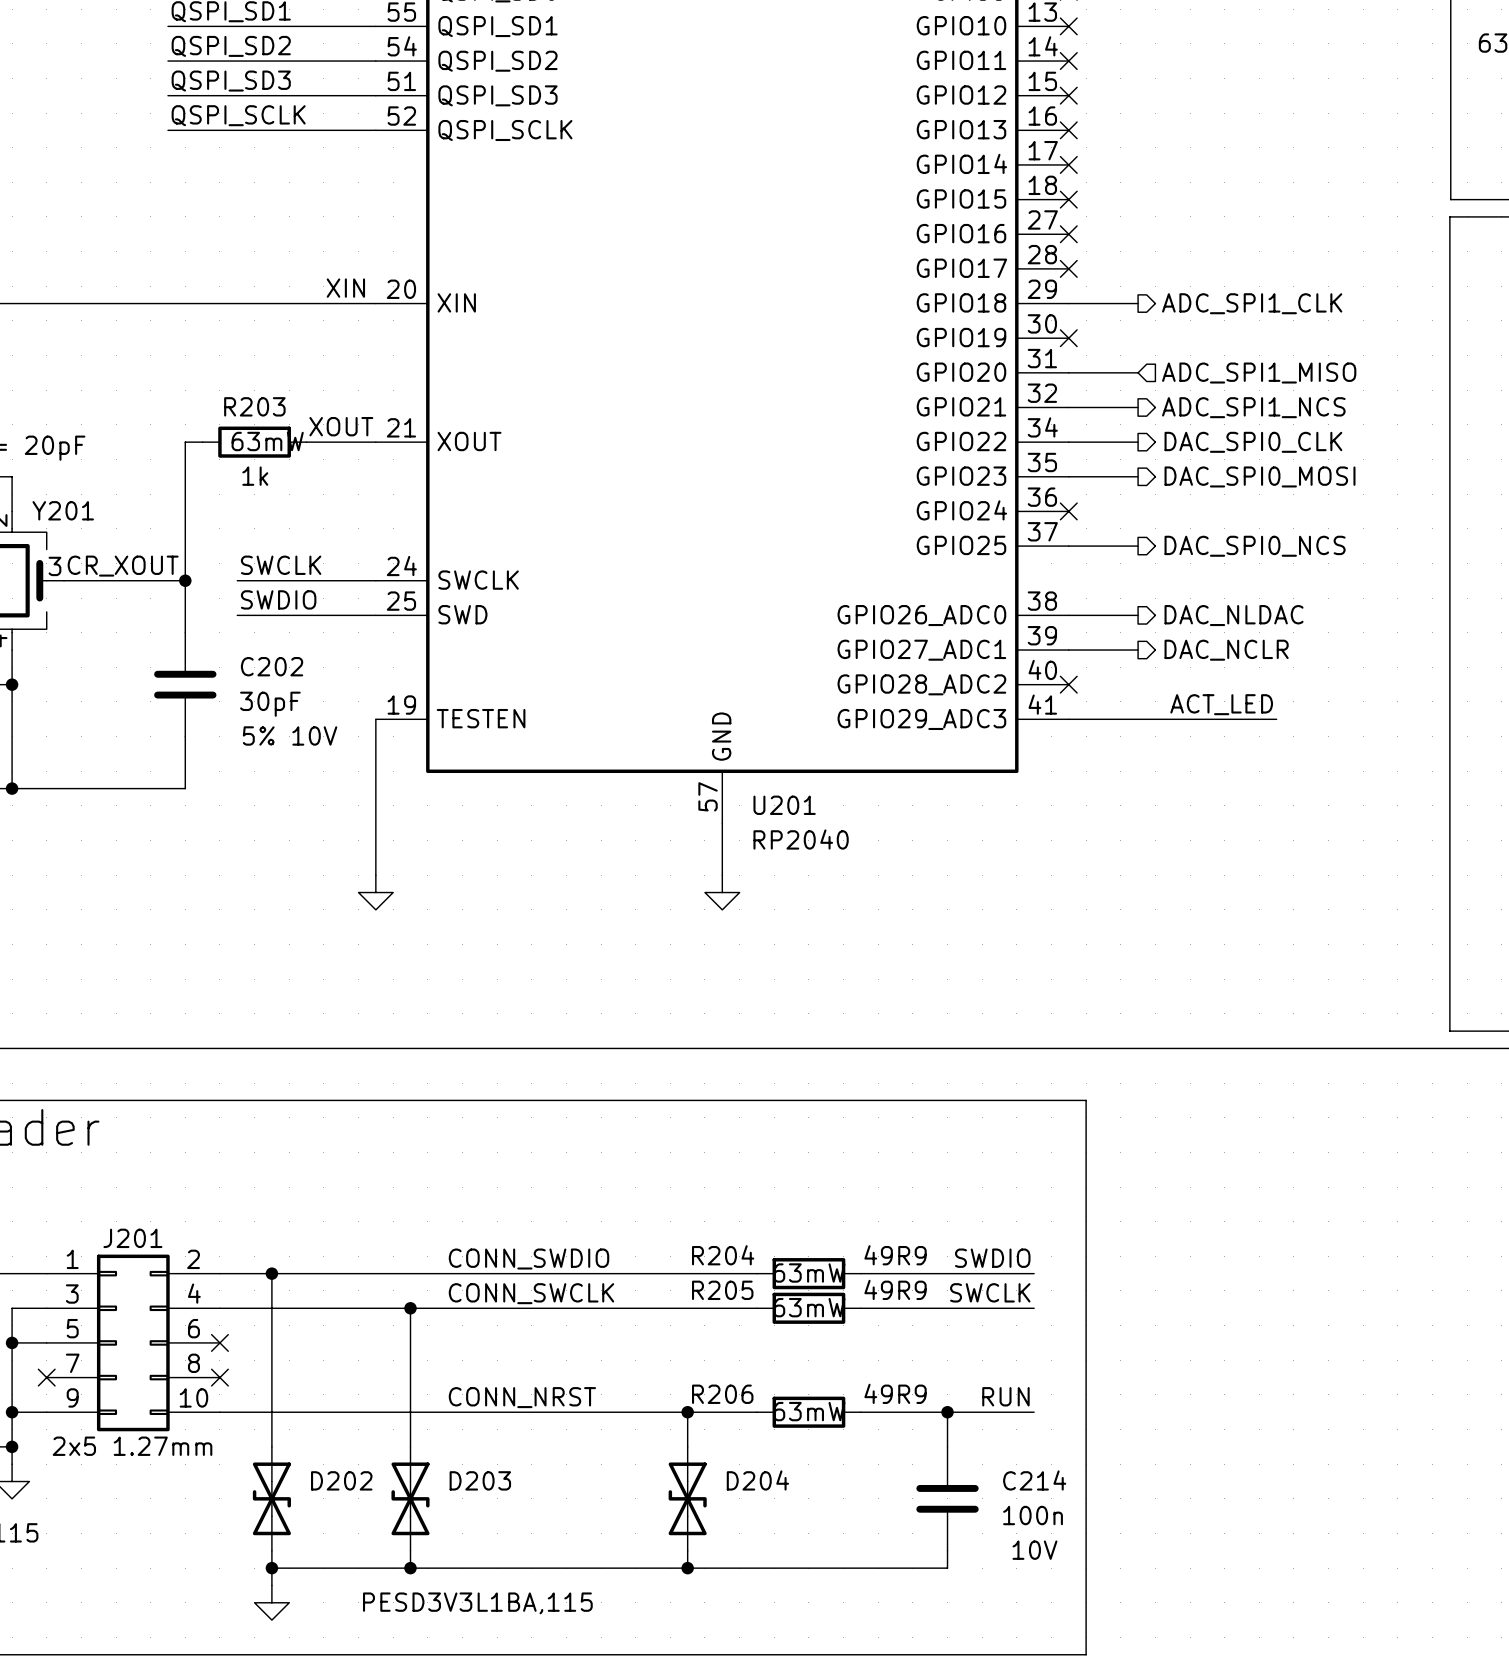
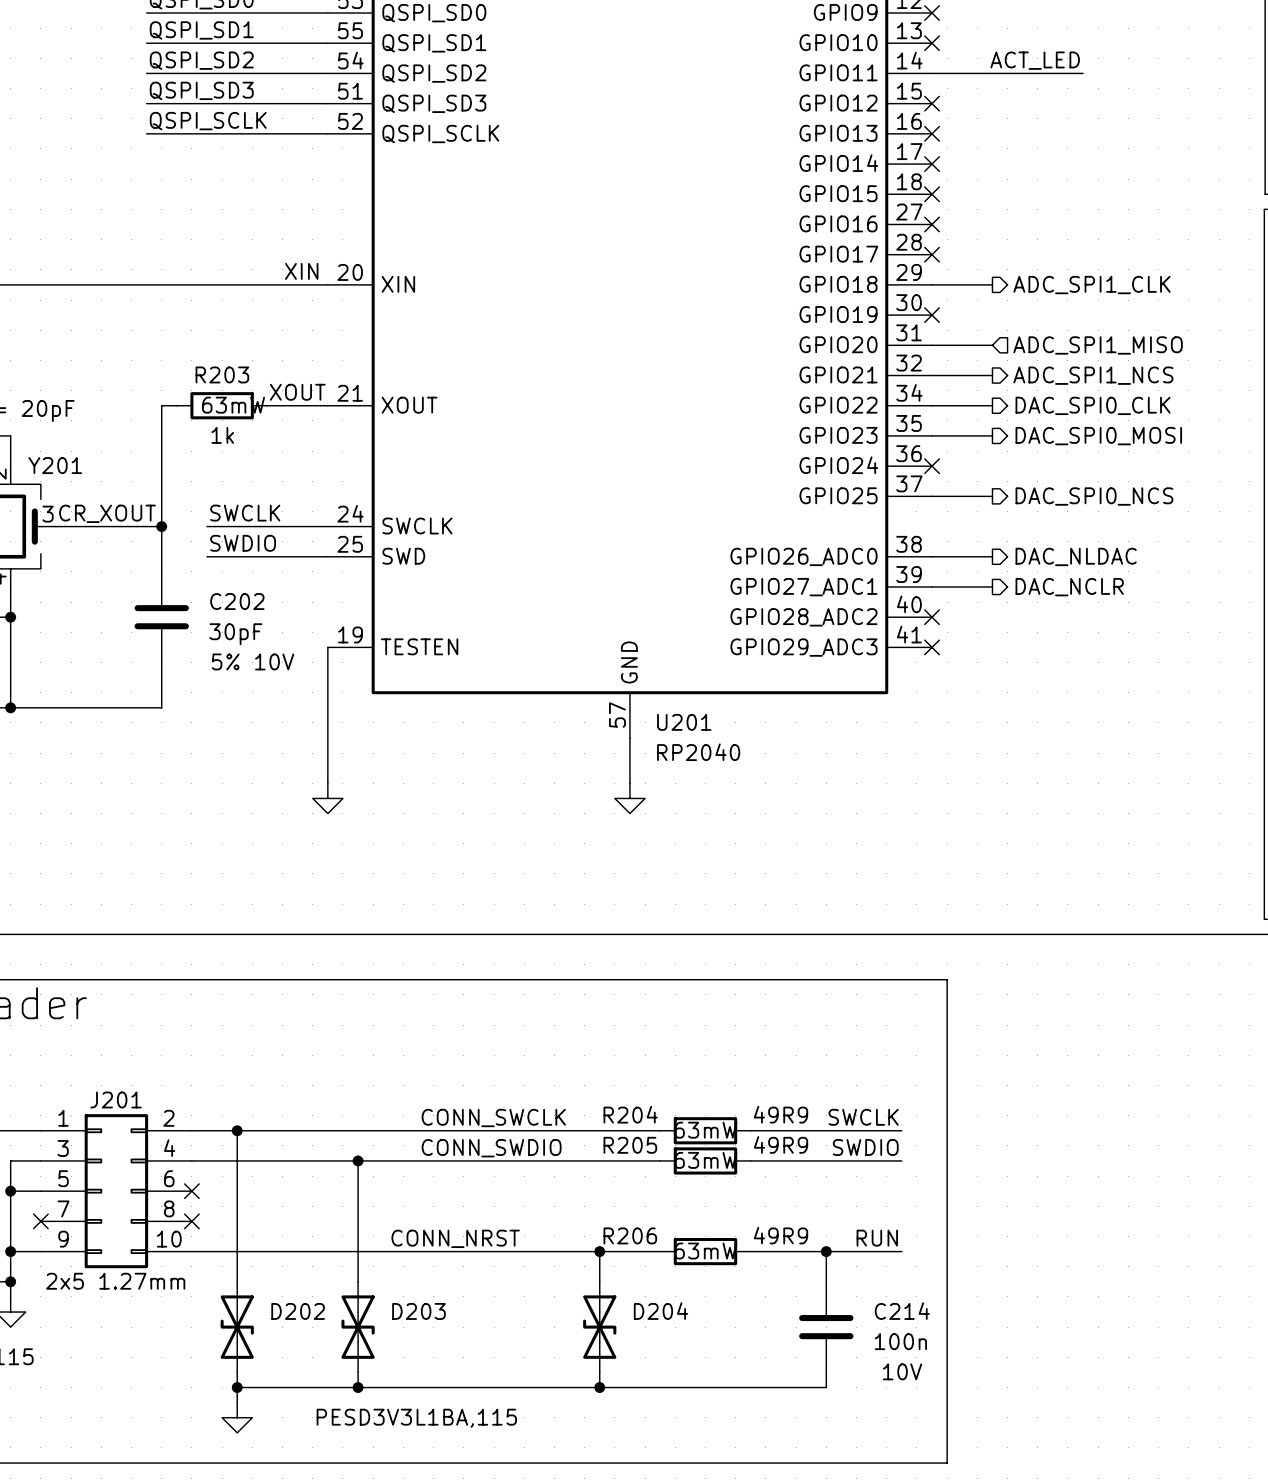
label: none -> ACT_LED (1035, 60)
wire: none -> (932, 73) (1083, 73)
no-connect mark: (1068, 61) -> none
label: ACT_LED (1221, 704) -> none
wire: (1068, 719) (1276, 719) -> none
no-connect mark: none -> (932, 647)
label: SWDIO (992, 1258) -> SWCLK (863, 1117)
label position: CONN_SWDIO (529, 1259) -> CONN_SWDIO (491, 1148)
label: SWCLK (990, 1292) -> SWDIO (865, 1147)
label position: CONN_SWCLK (531, 1293) -> CONN_SWCLK (493, 1117)

